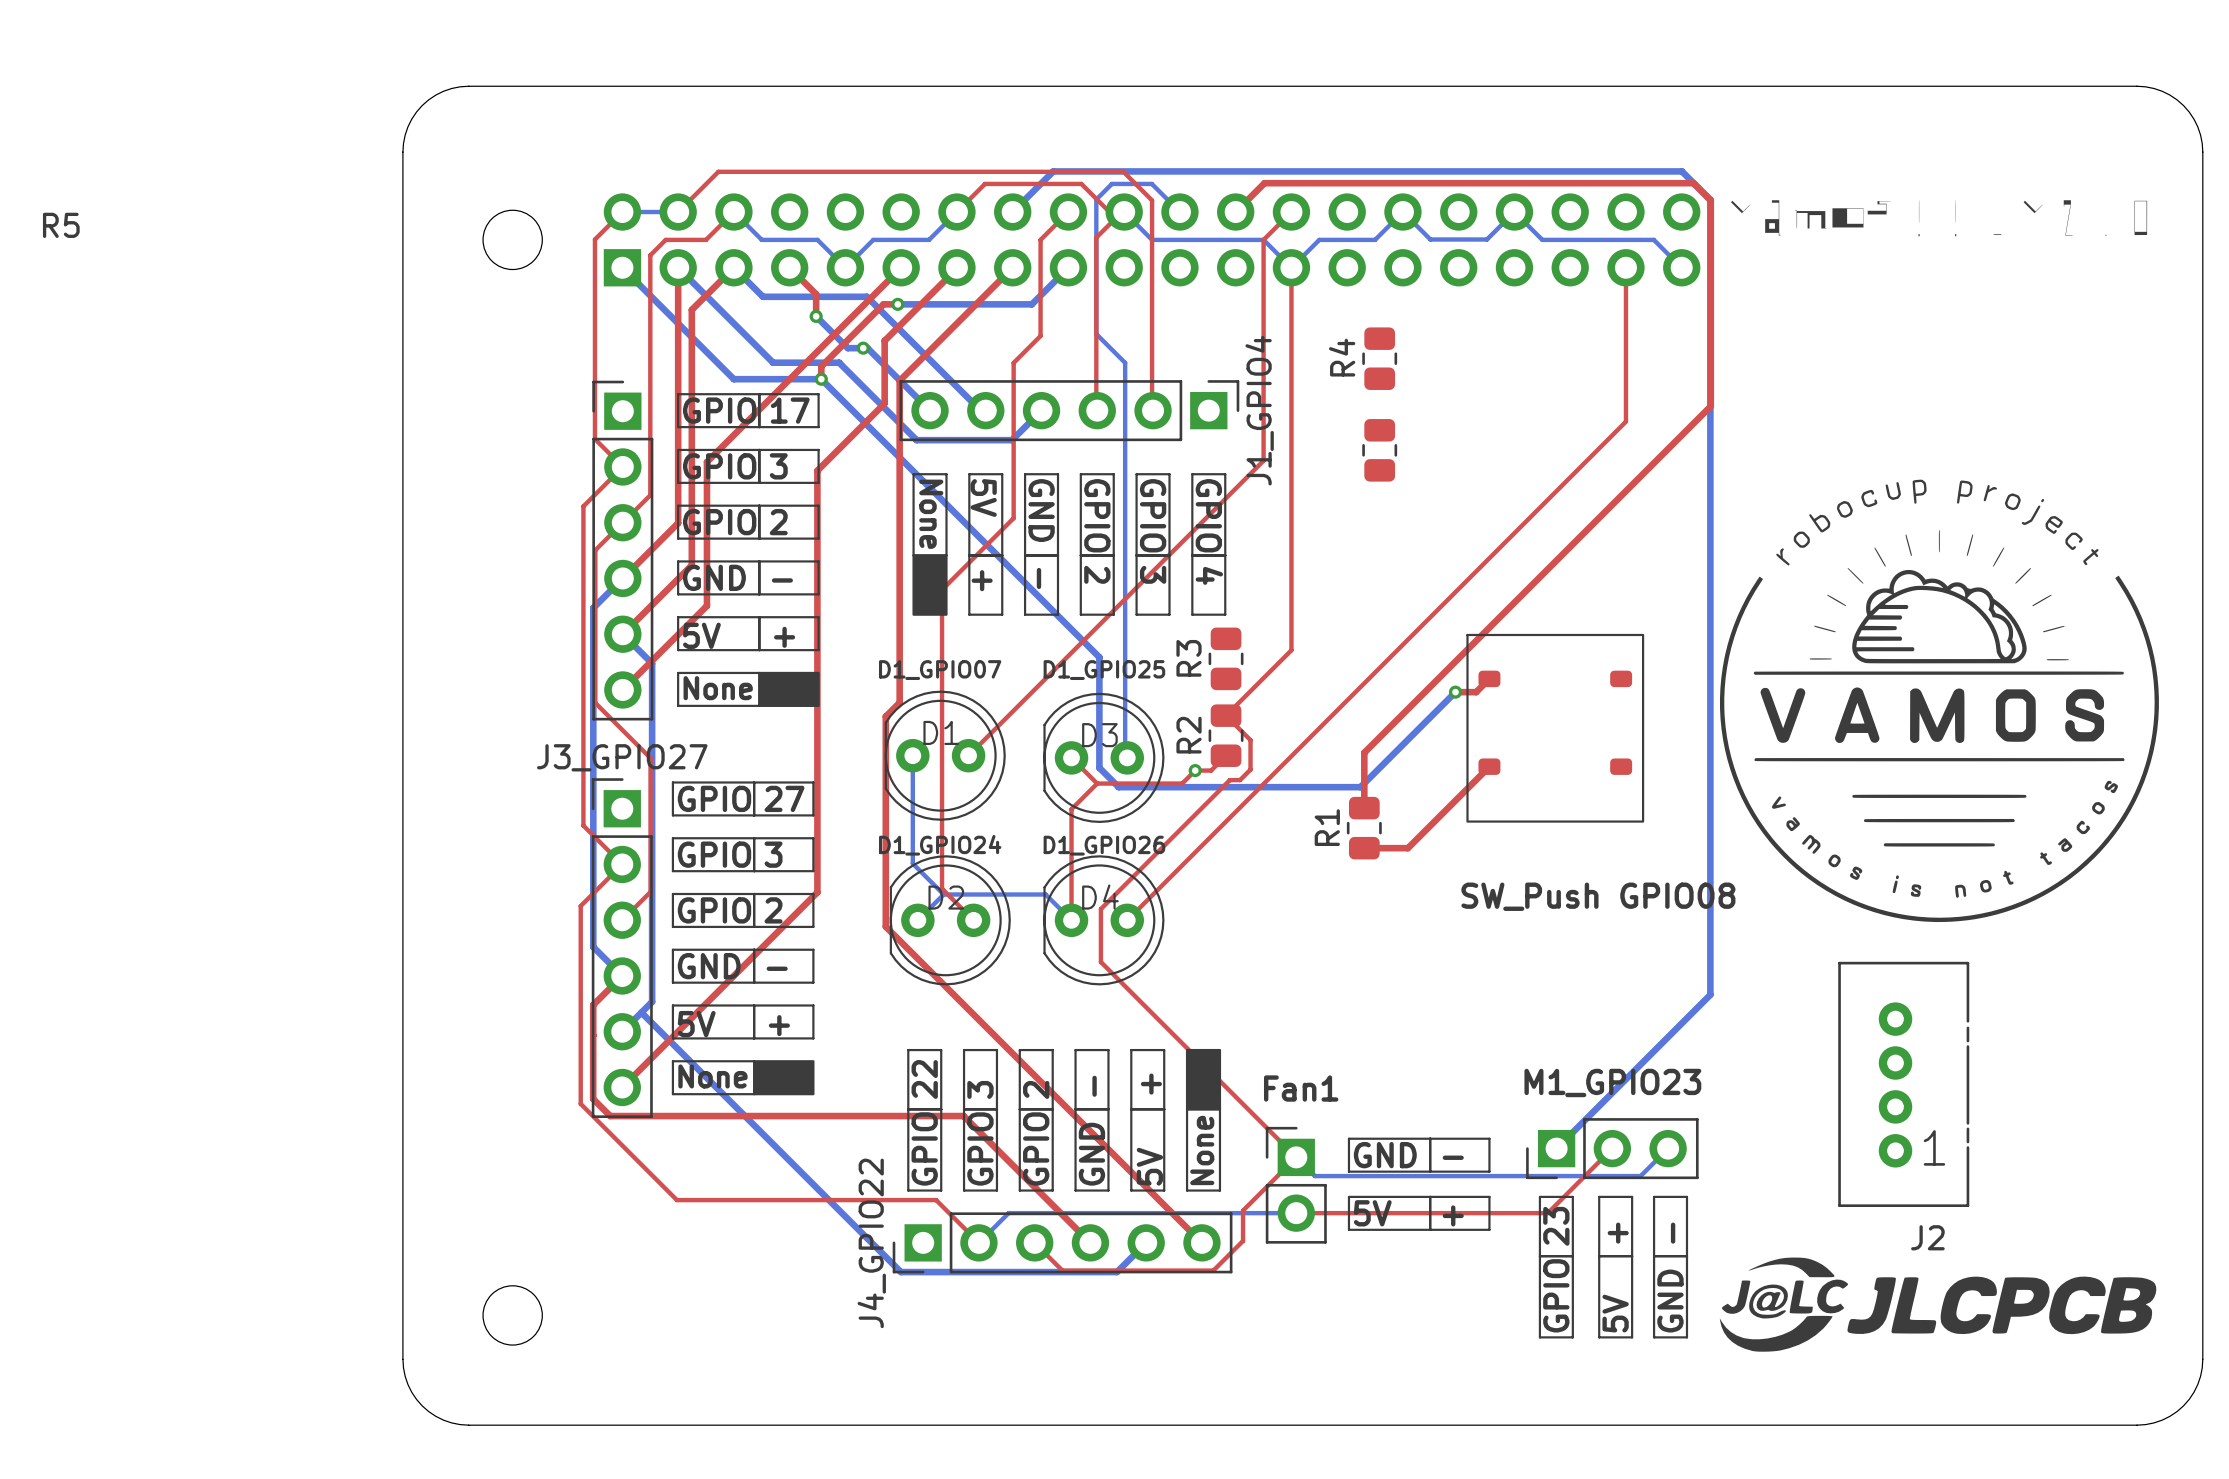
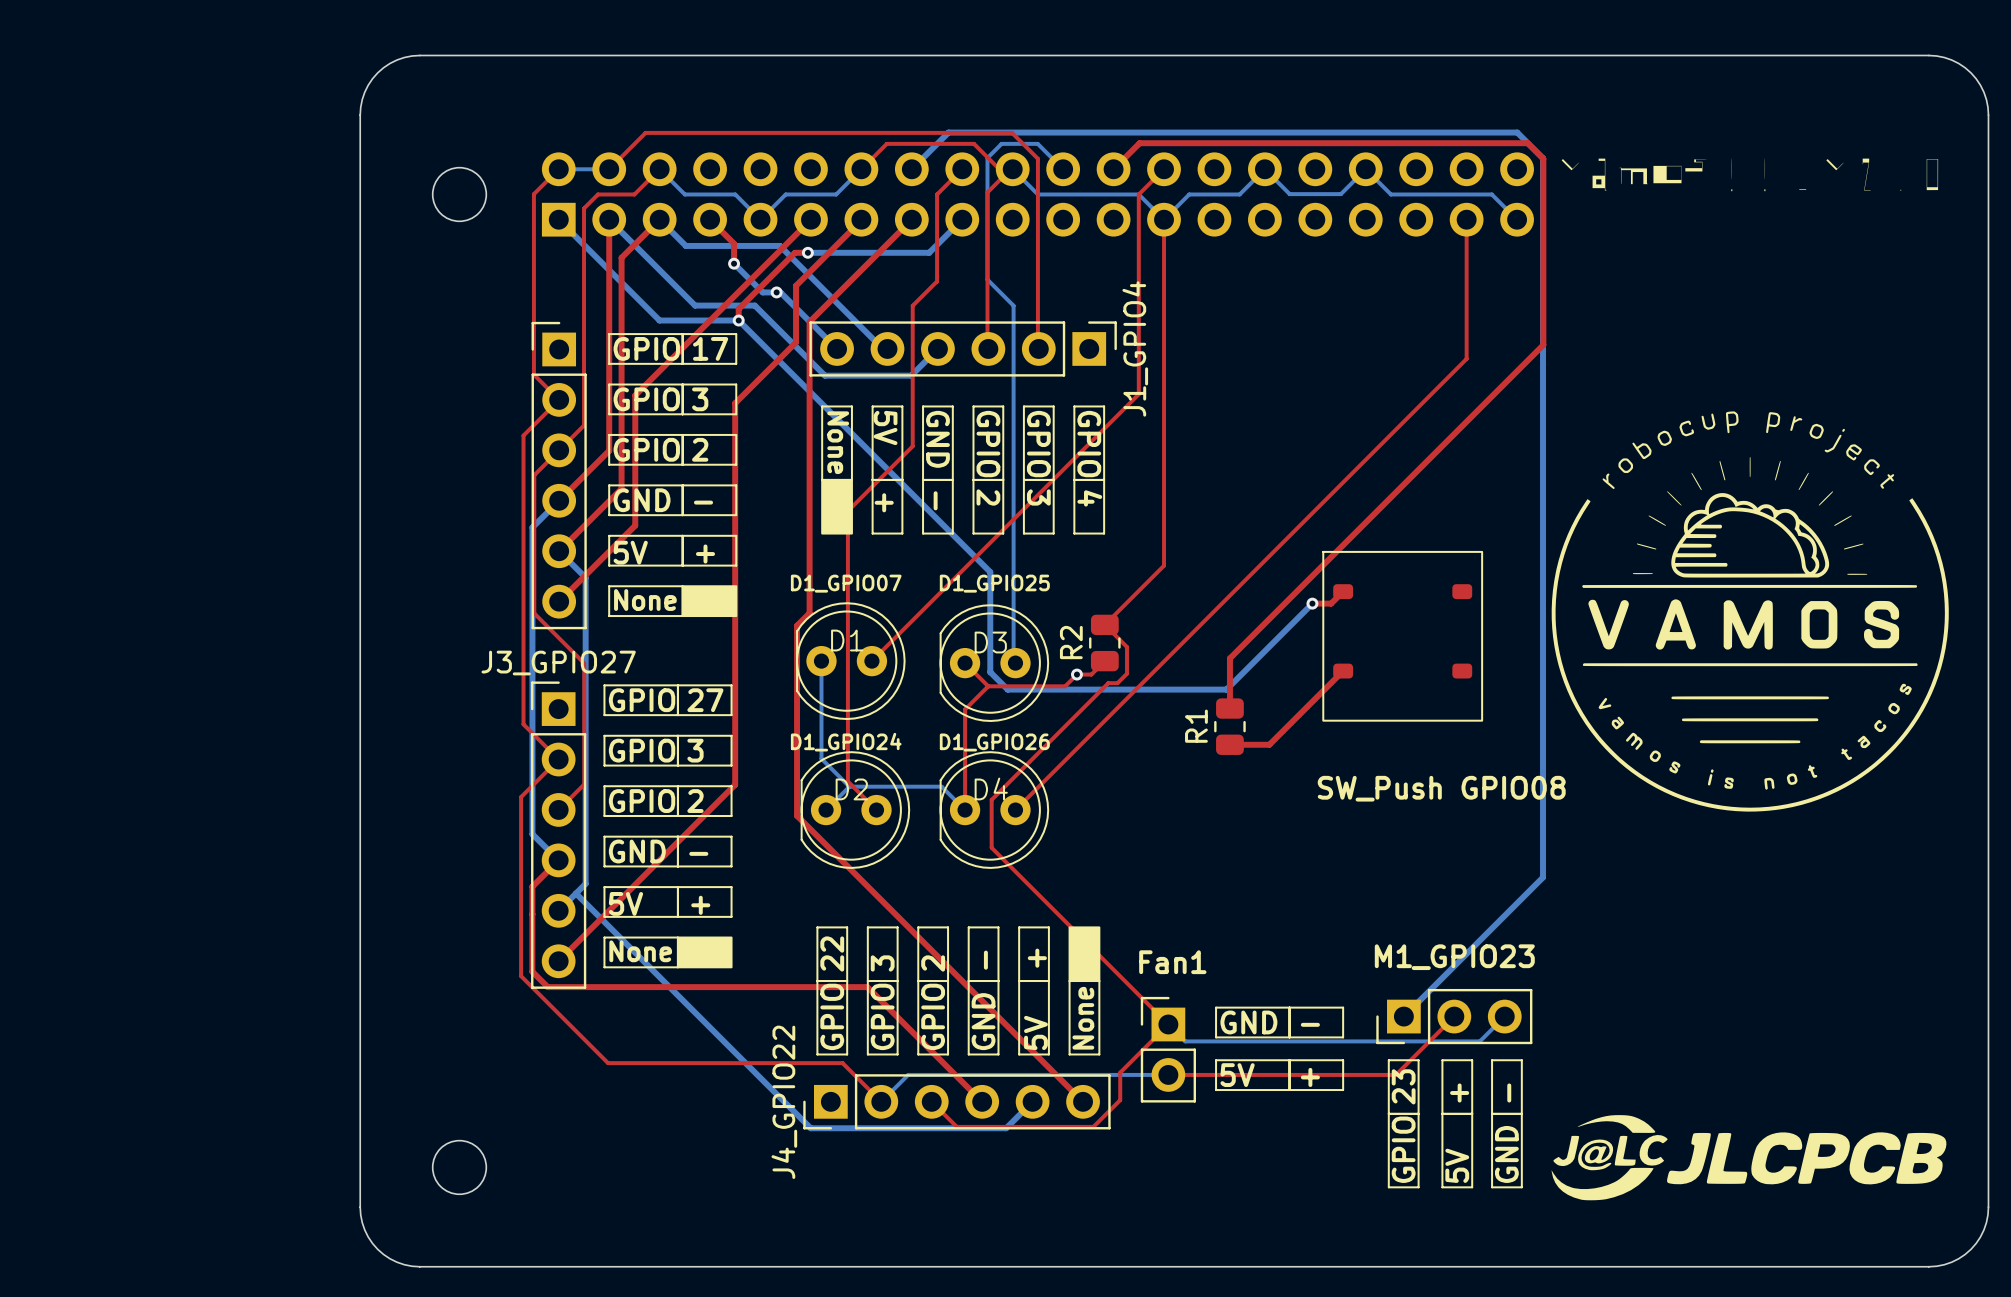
R4: (1379, 358) -> none
R5: (1379, 450) -> none
R3: (1226, 658) -> none
J2: (1903, 1084) -> none

